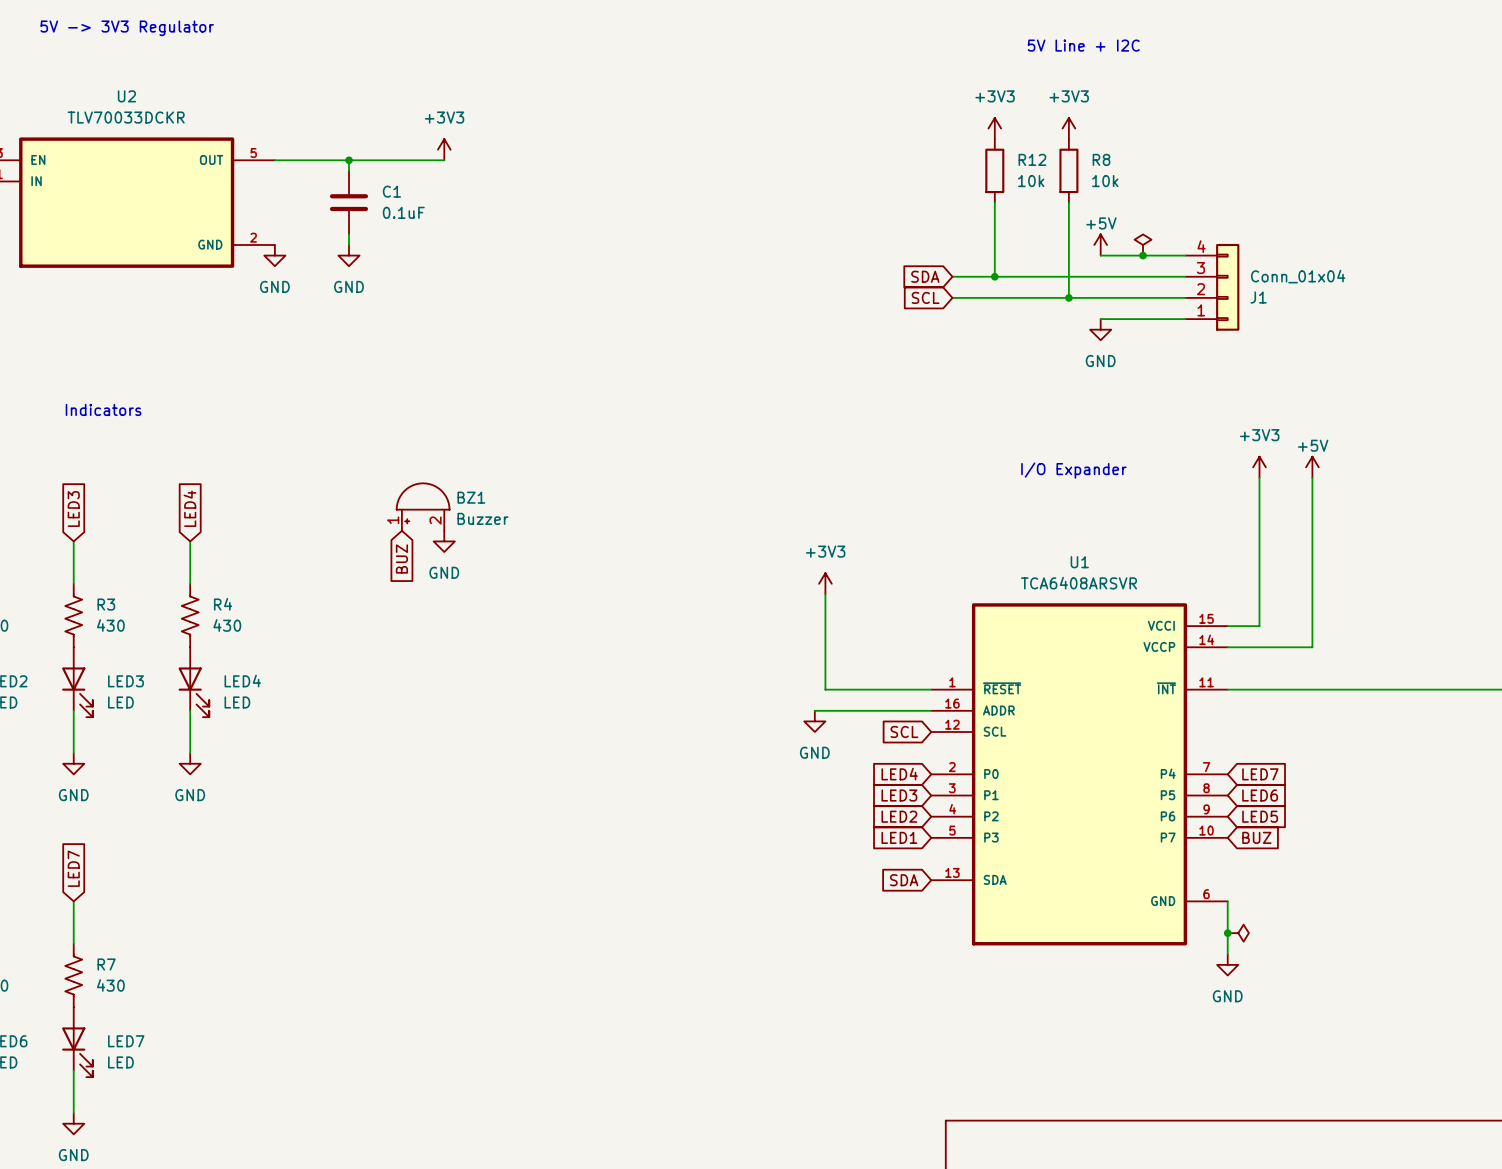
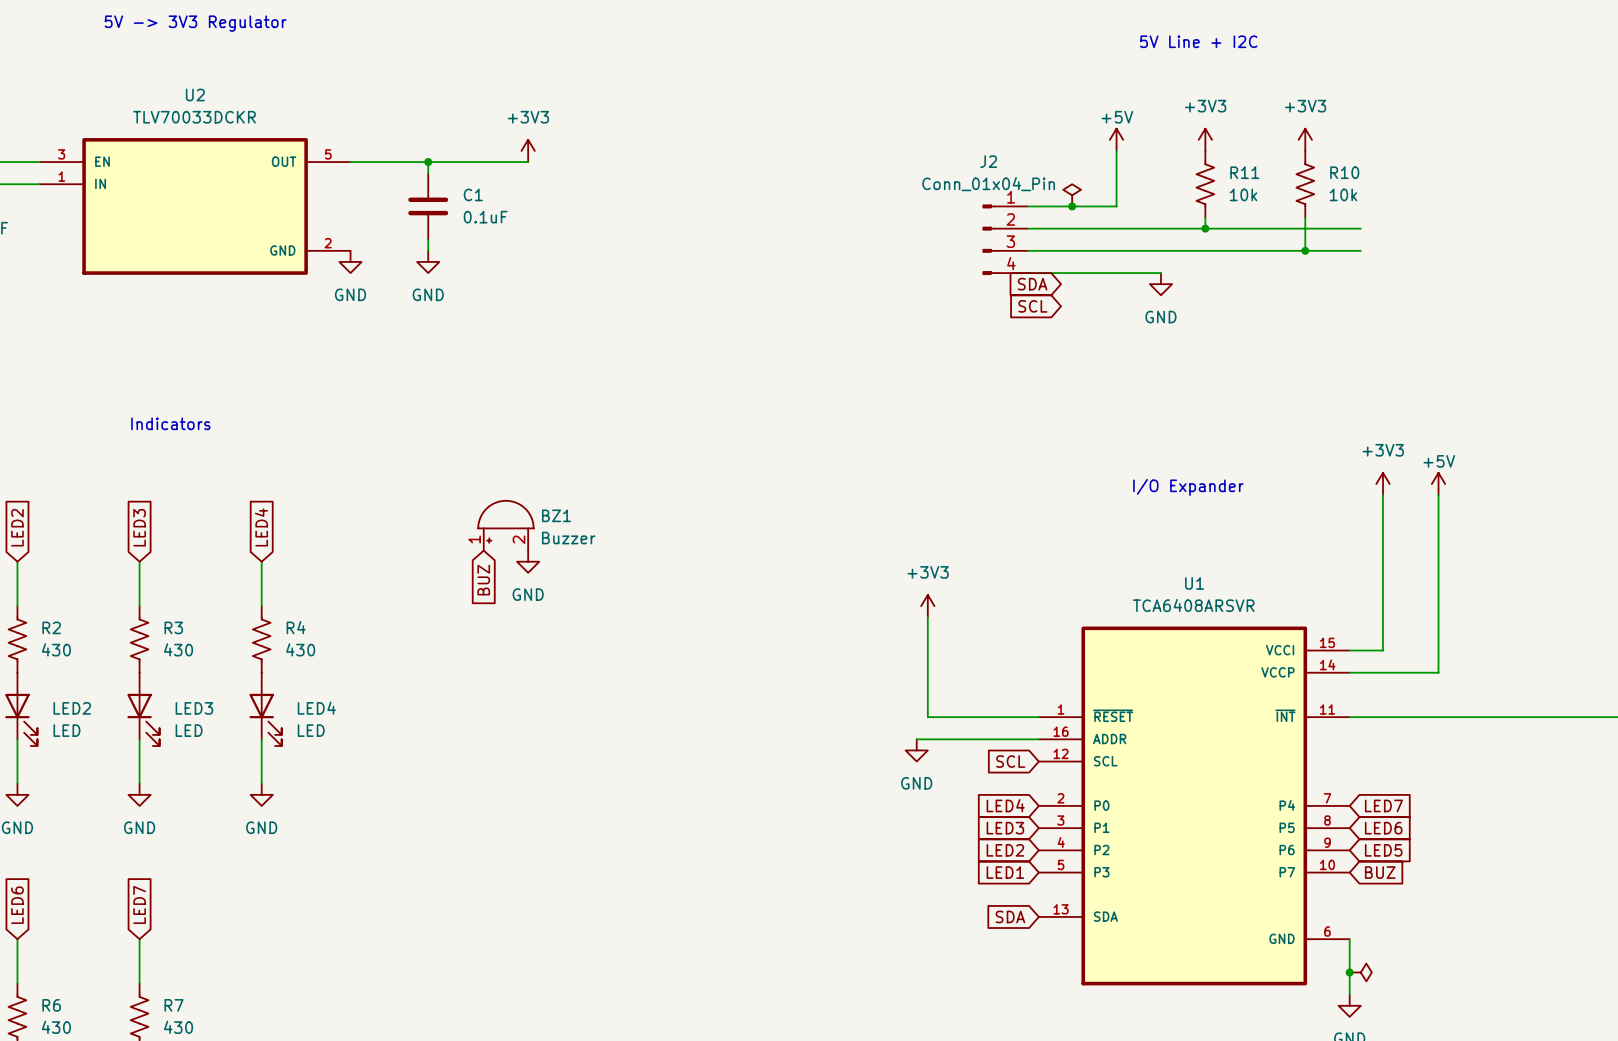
power symbol: +3V3 (994, 128) -> none
power symbol position: +3V3 (1068, 128) -> +3V3 (1205, 139)
power symbol: none -> +3V3 (1305, 139)
wire: none -> (1116, 150) (1116, 206) (1027, 206)
R12: 10k (994, 170) -> none
R8: 10k (1068, 170) -> none
R11: none -> 10k (1205, 184)
R10: none -> 10k (1305, 184)
junction: none -> (1072, 206)
wire: (994, 202) (994, 276) -> none
wire: (1068, 202) (1068, 297) -> none
wire: none -> (1205, 217) (1205, 228)
wire: none -> (1305, 217) (1305, 250)
wire: none -> (1027, 228) (1360, 228)
junction: none -> (1205, 228)
J2: none -> Conn_01x04_Pin (1005, 239)
wire: none -> (1027, 250) (1360, 250)
power symbol position: +5V (1100, 244) -> +5V (1116, 139)
power symbol position: (1143, 244) -> (1072, 195)
junction: none -> (1305, 250)
wire: (1100, 255) (1185, 255) -> none
junction: (1143, 255) -> none
wire: none -> (1027, 273) (1160, 273)
wire: (952, 276) (1185, 276) -> none
junction: (994, 276) -> none
J1: Conn_01x04 (1212, 287) -> none
wire: (952, 297) (1185, 297) -> none
junction: (1068, 297) -> none
wire: (1100, 319) (1185, 319) -> none
power symbol position: GND (1100, 329) -> GND (1160, 284)

